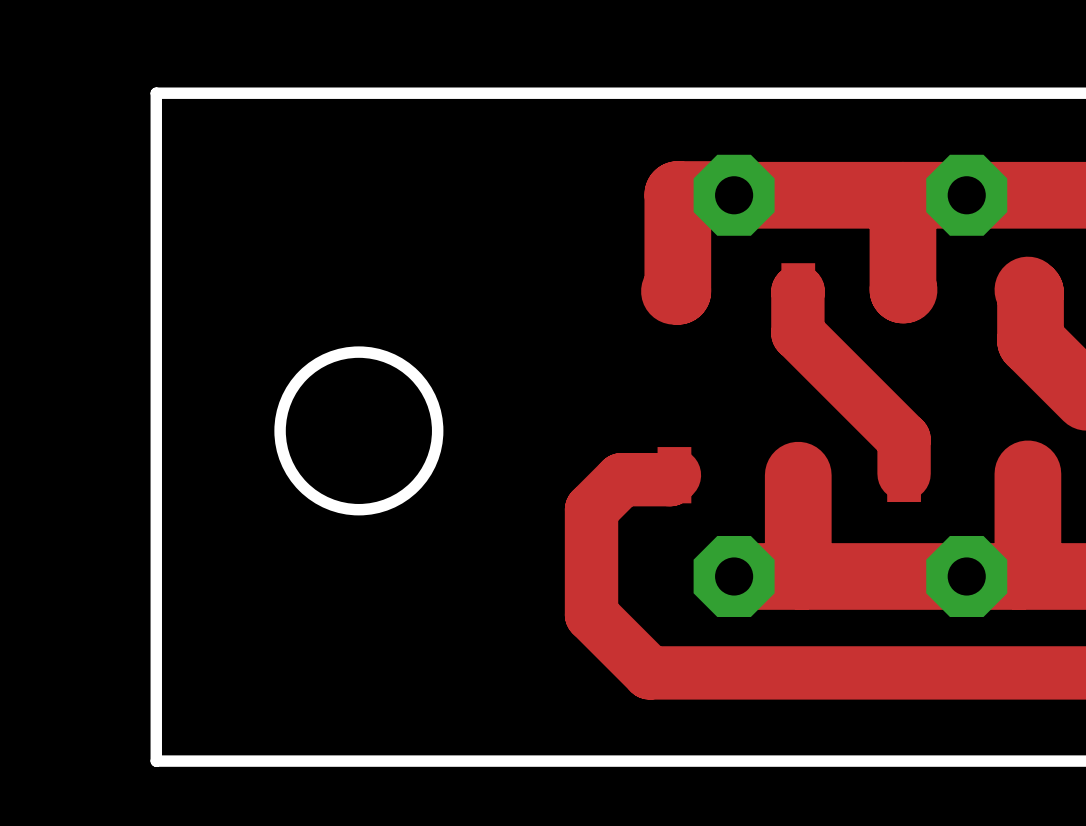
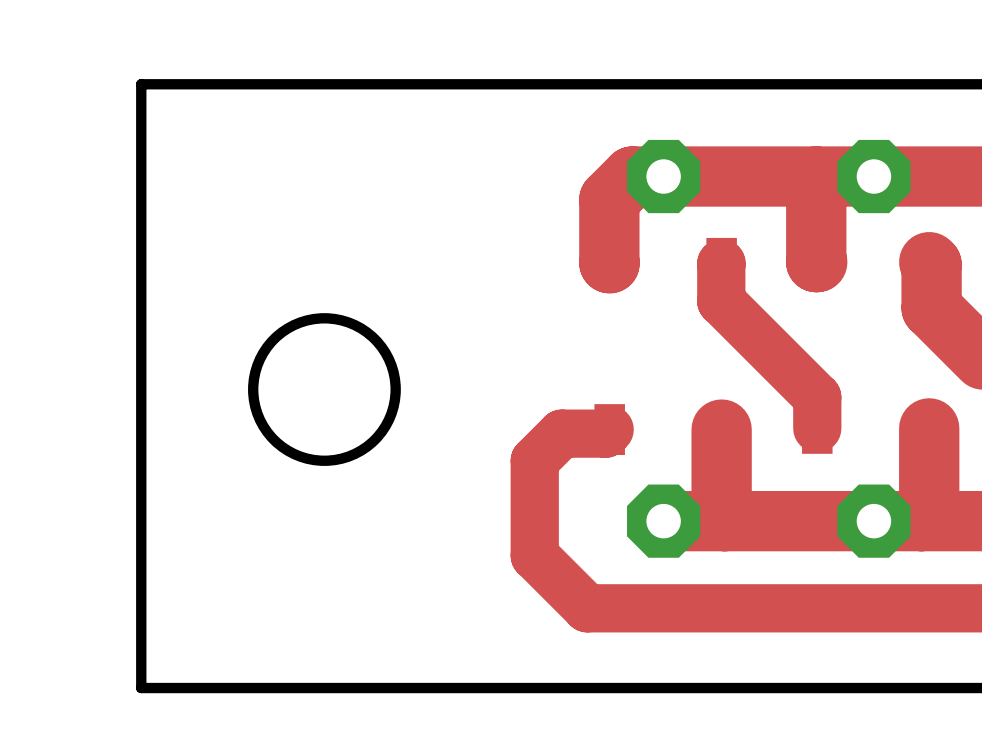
top track: (734, 194) (677, 194) (677, 291) (674, 291) -> (663, 176) (632, 176) (609, 199) (609, 263)

